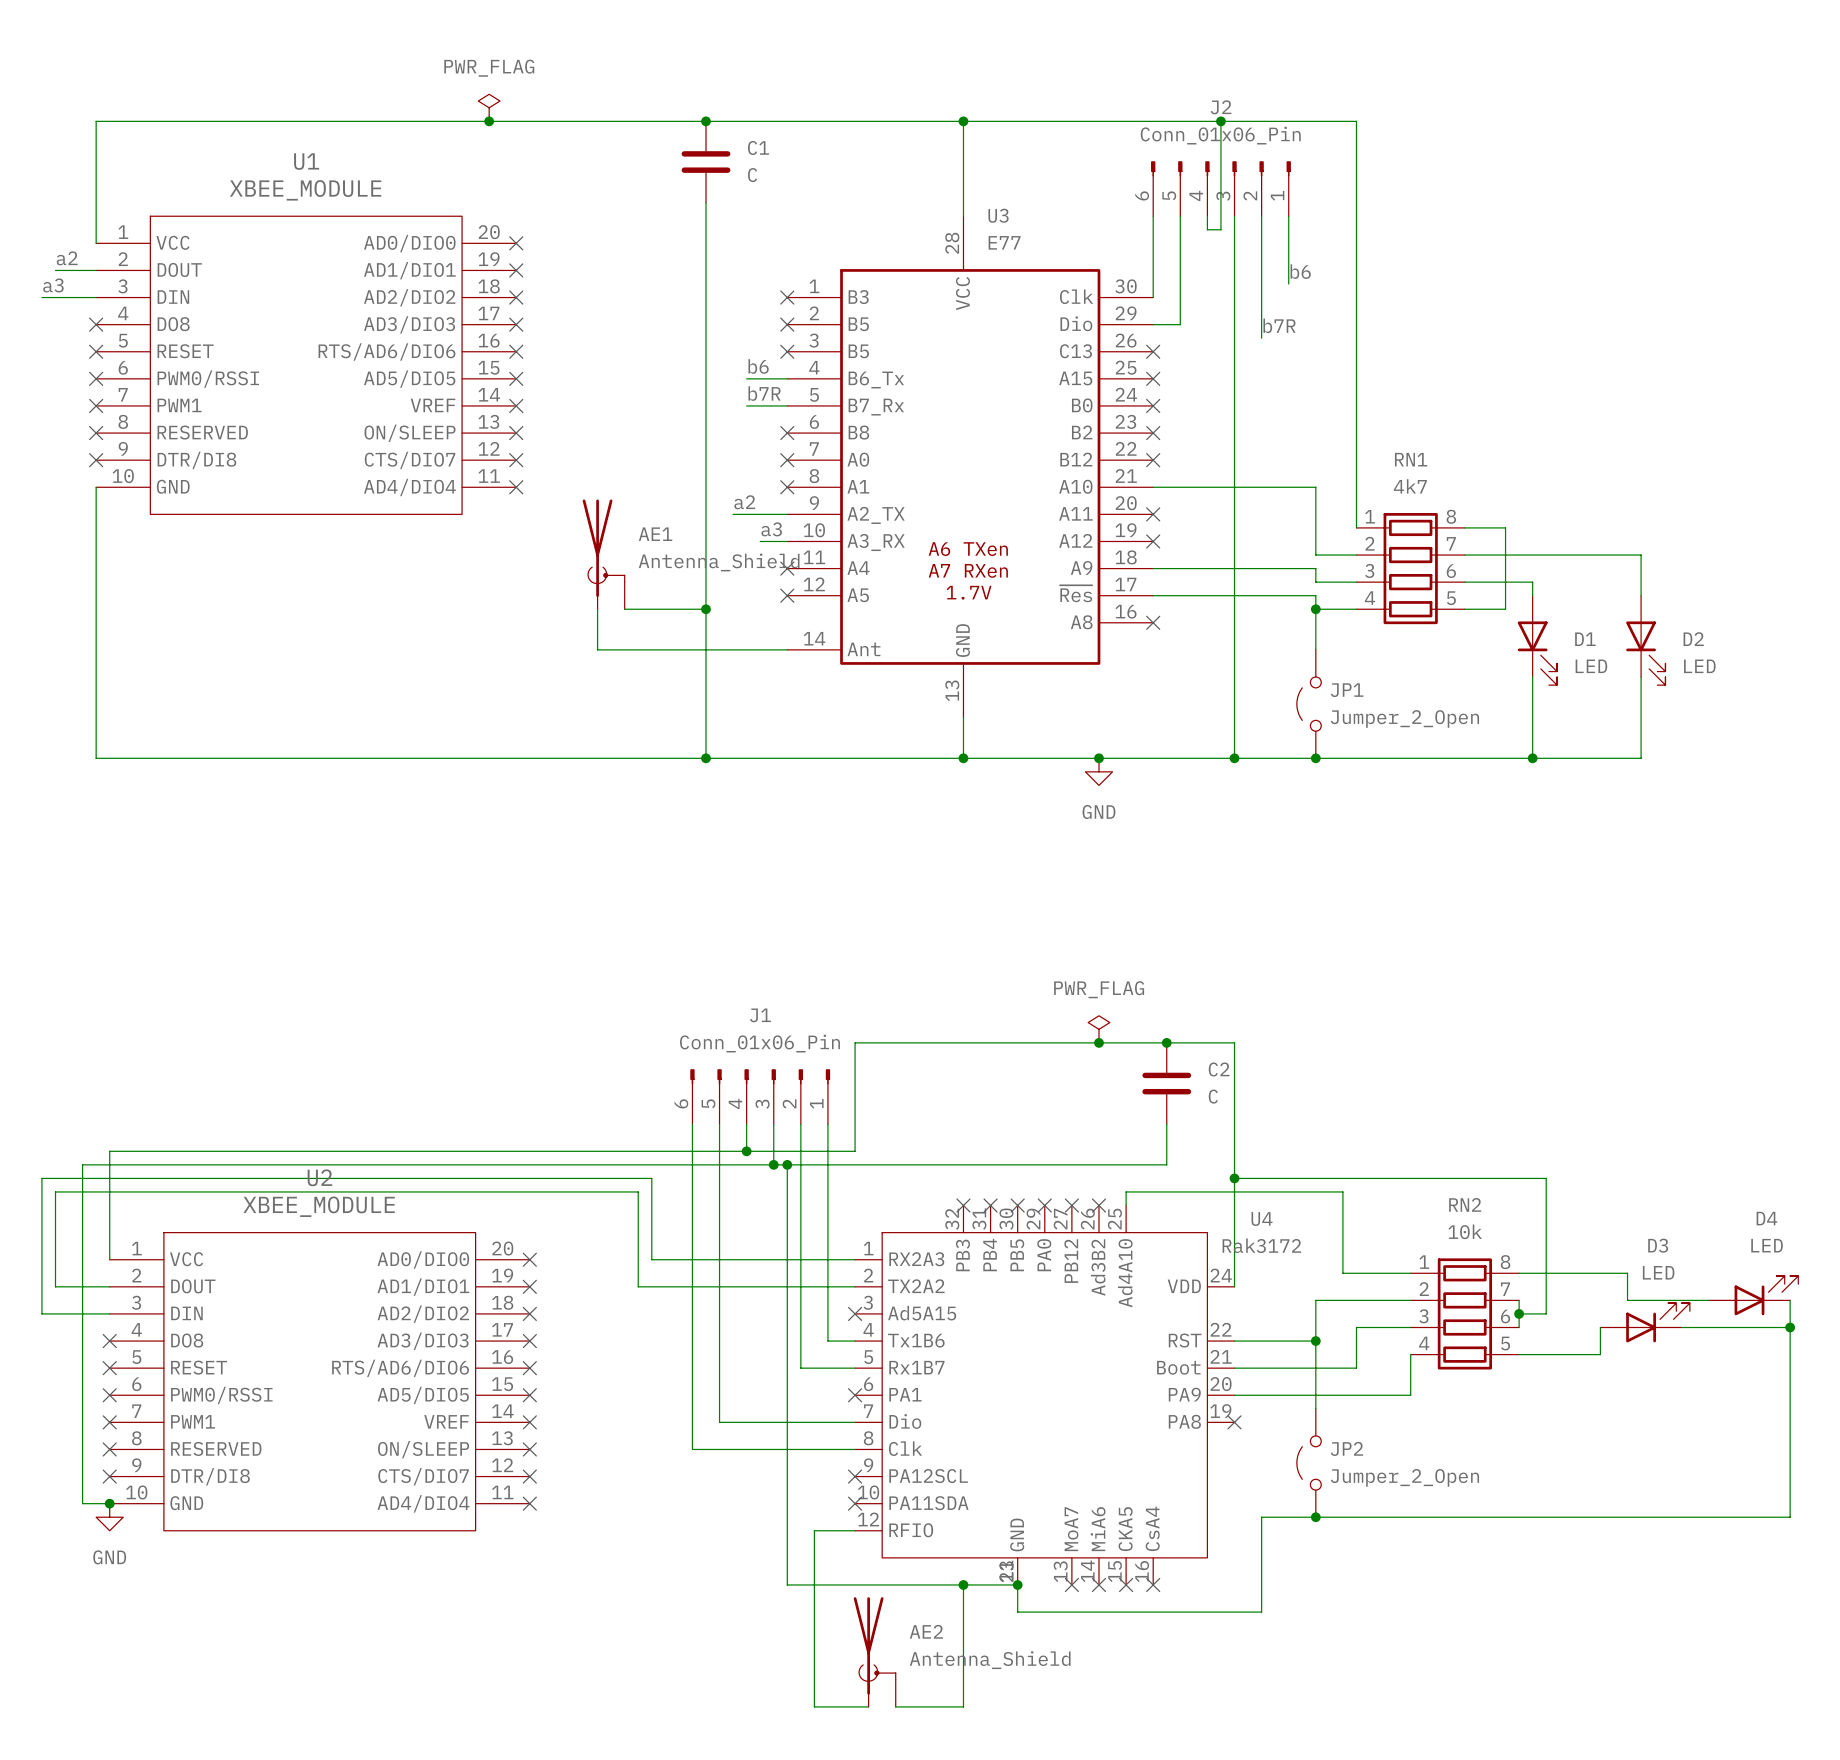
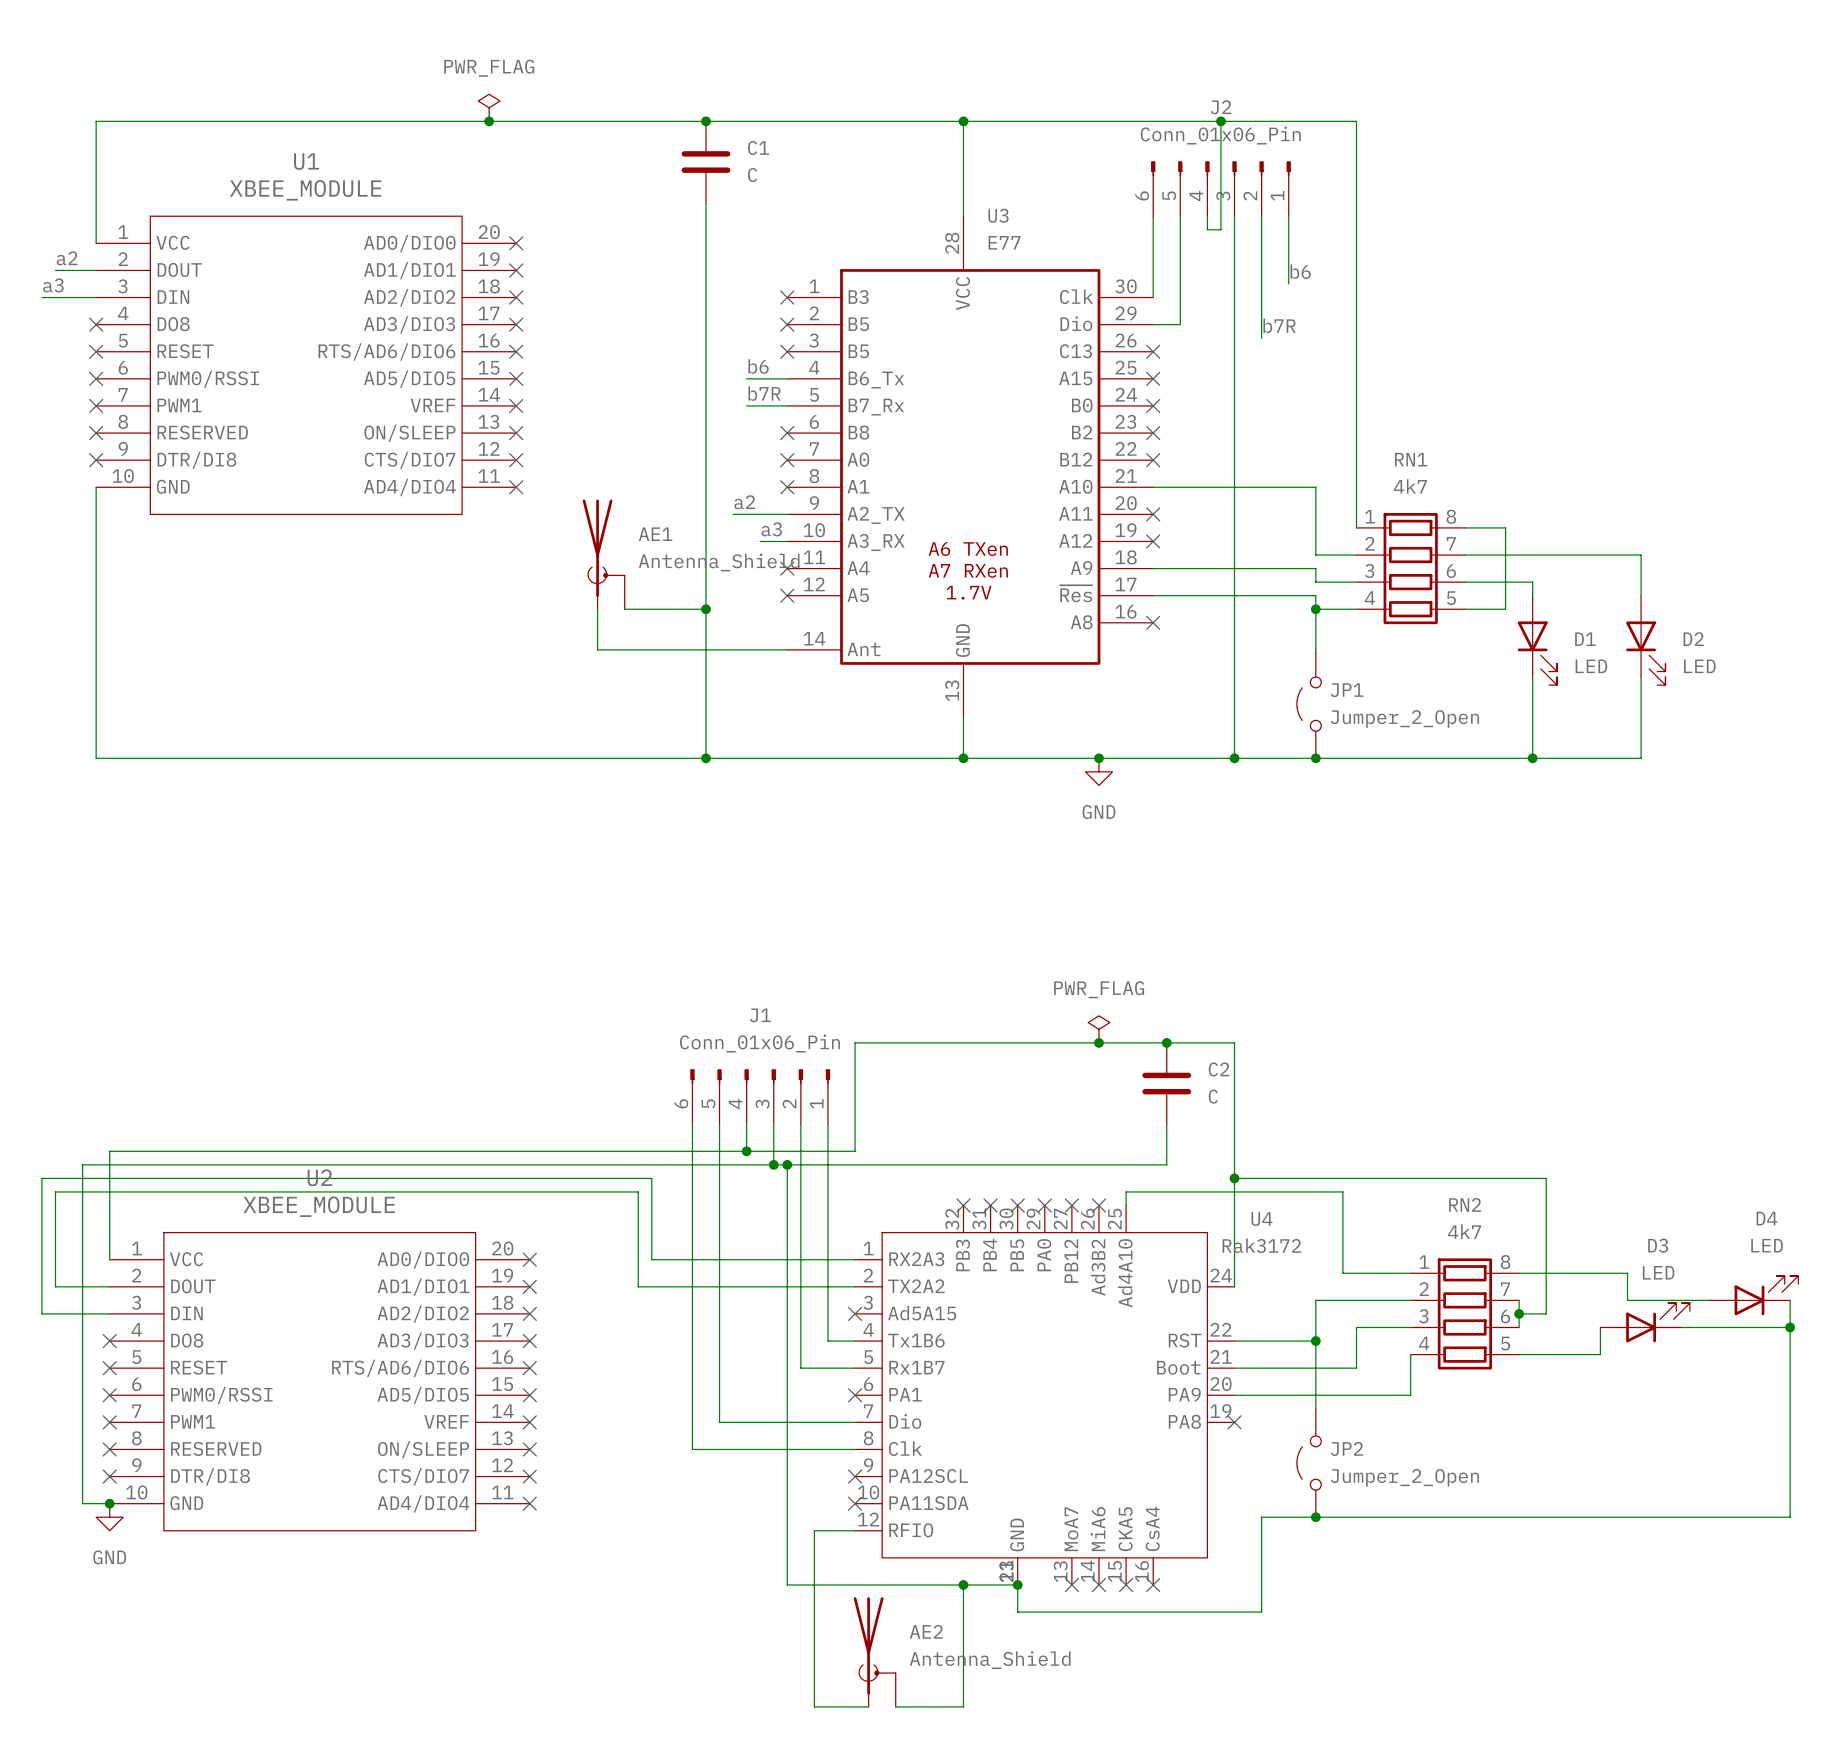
RN2 value: 10k (1465, 1231) -> 4k7 (1464, 1231)

